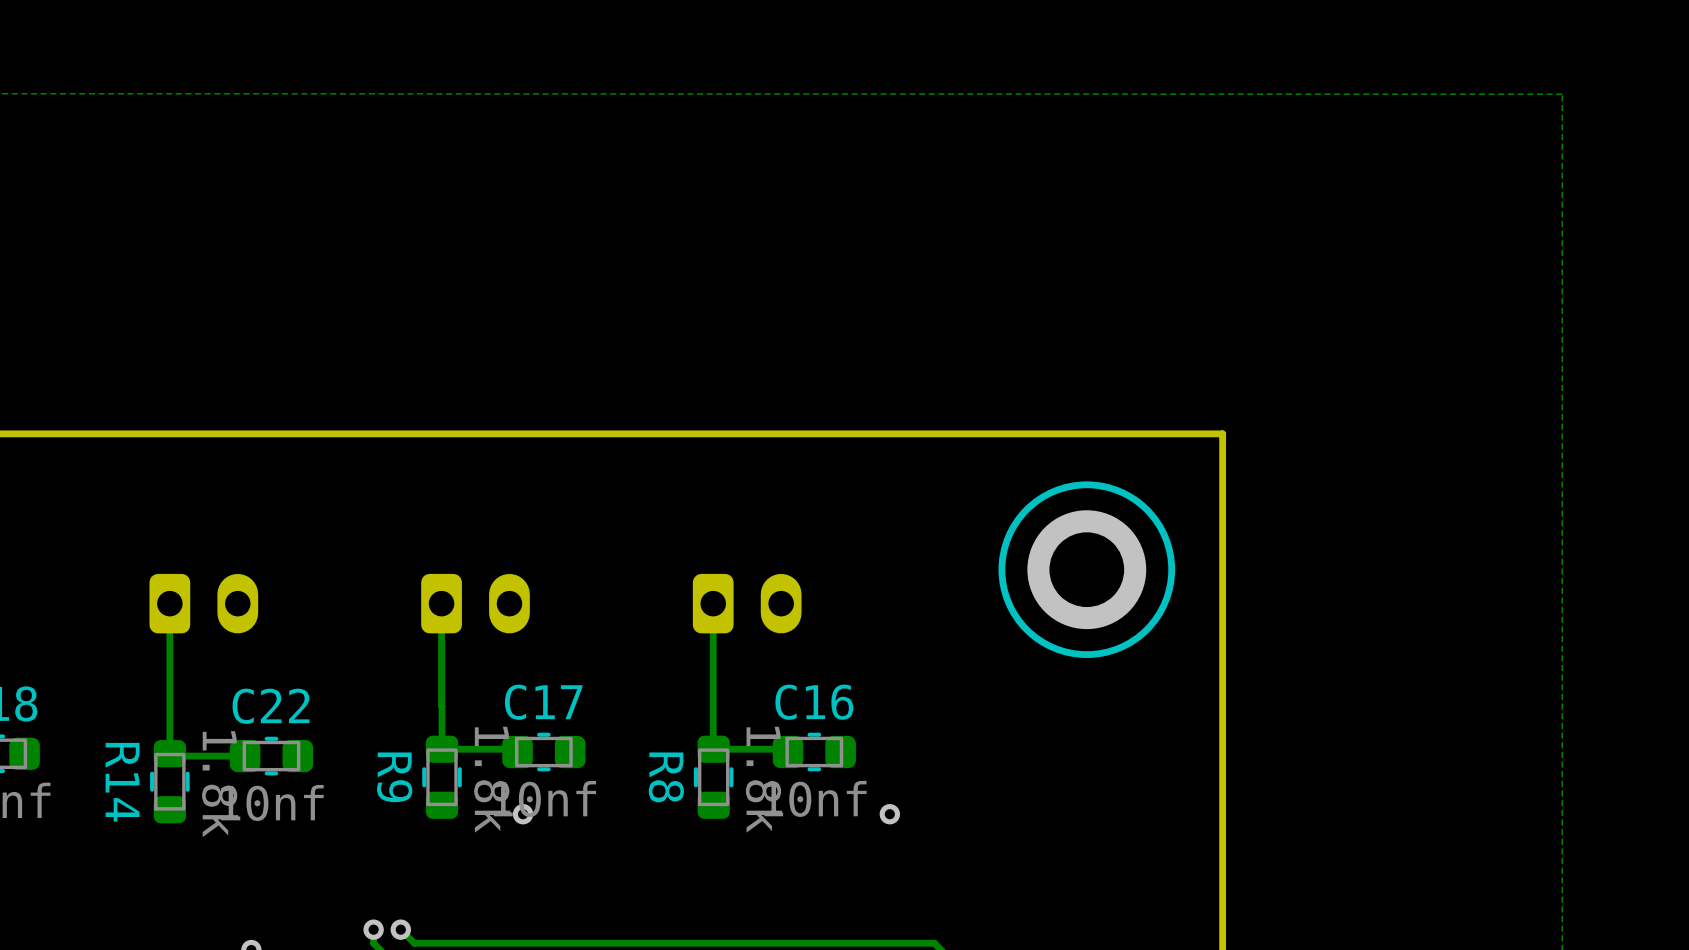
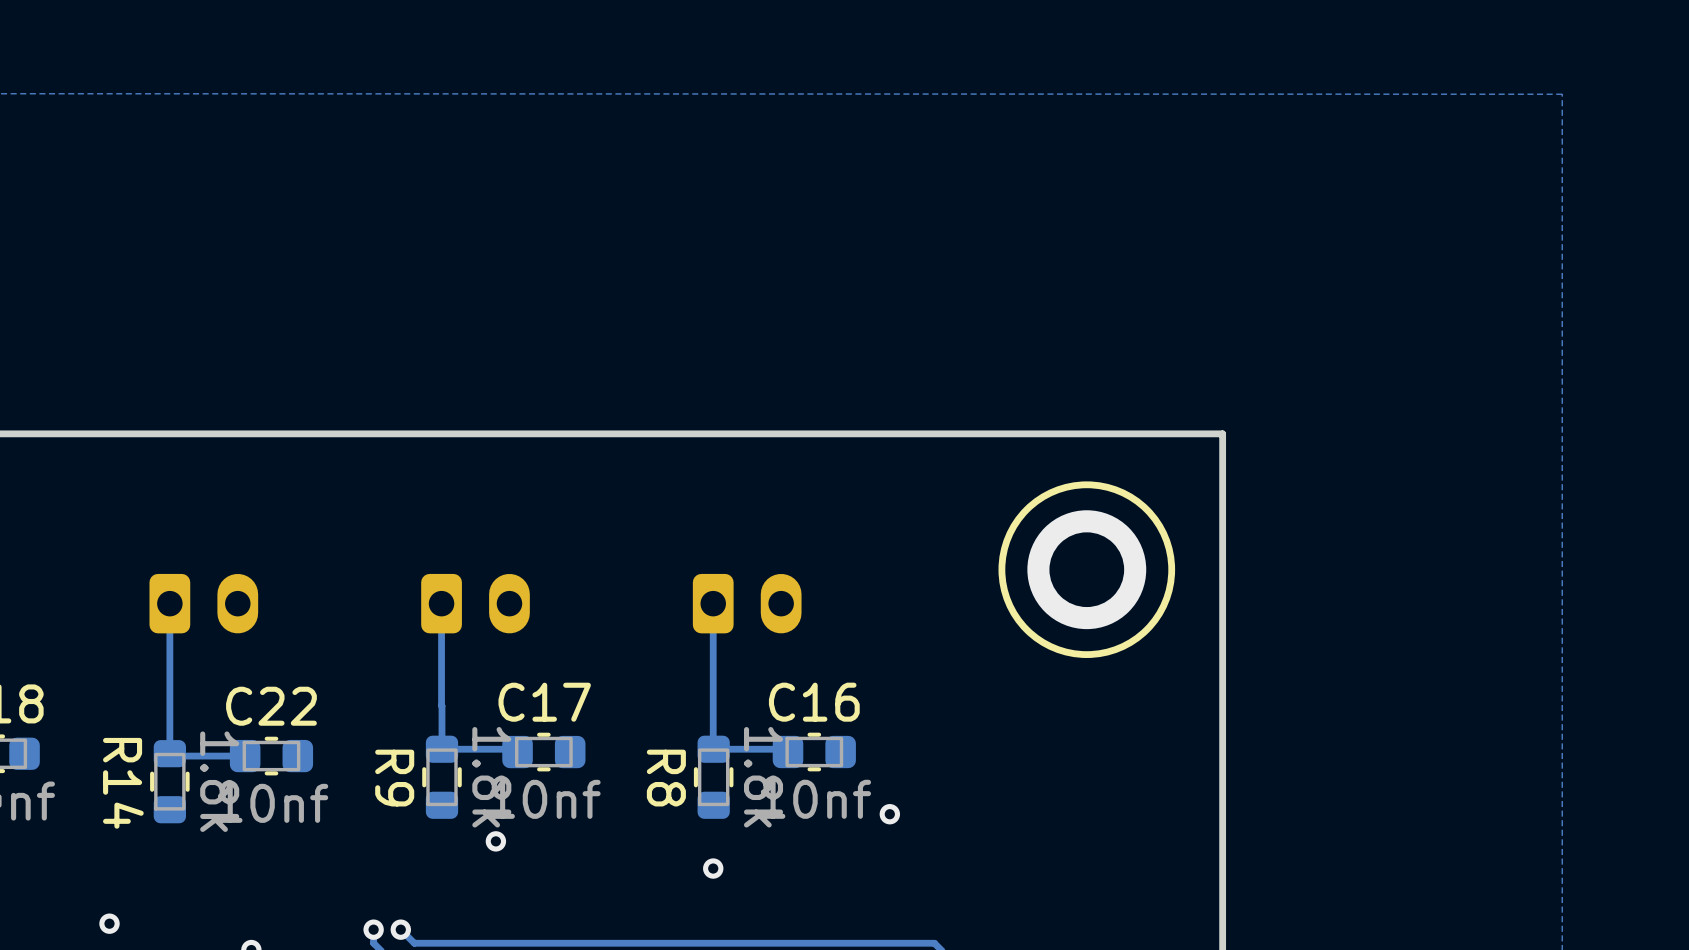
via position: (523, 814) -> (495, 841)
via: none -> (713, 868)
via: none -> (109, 923)

